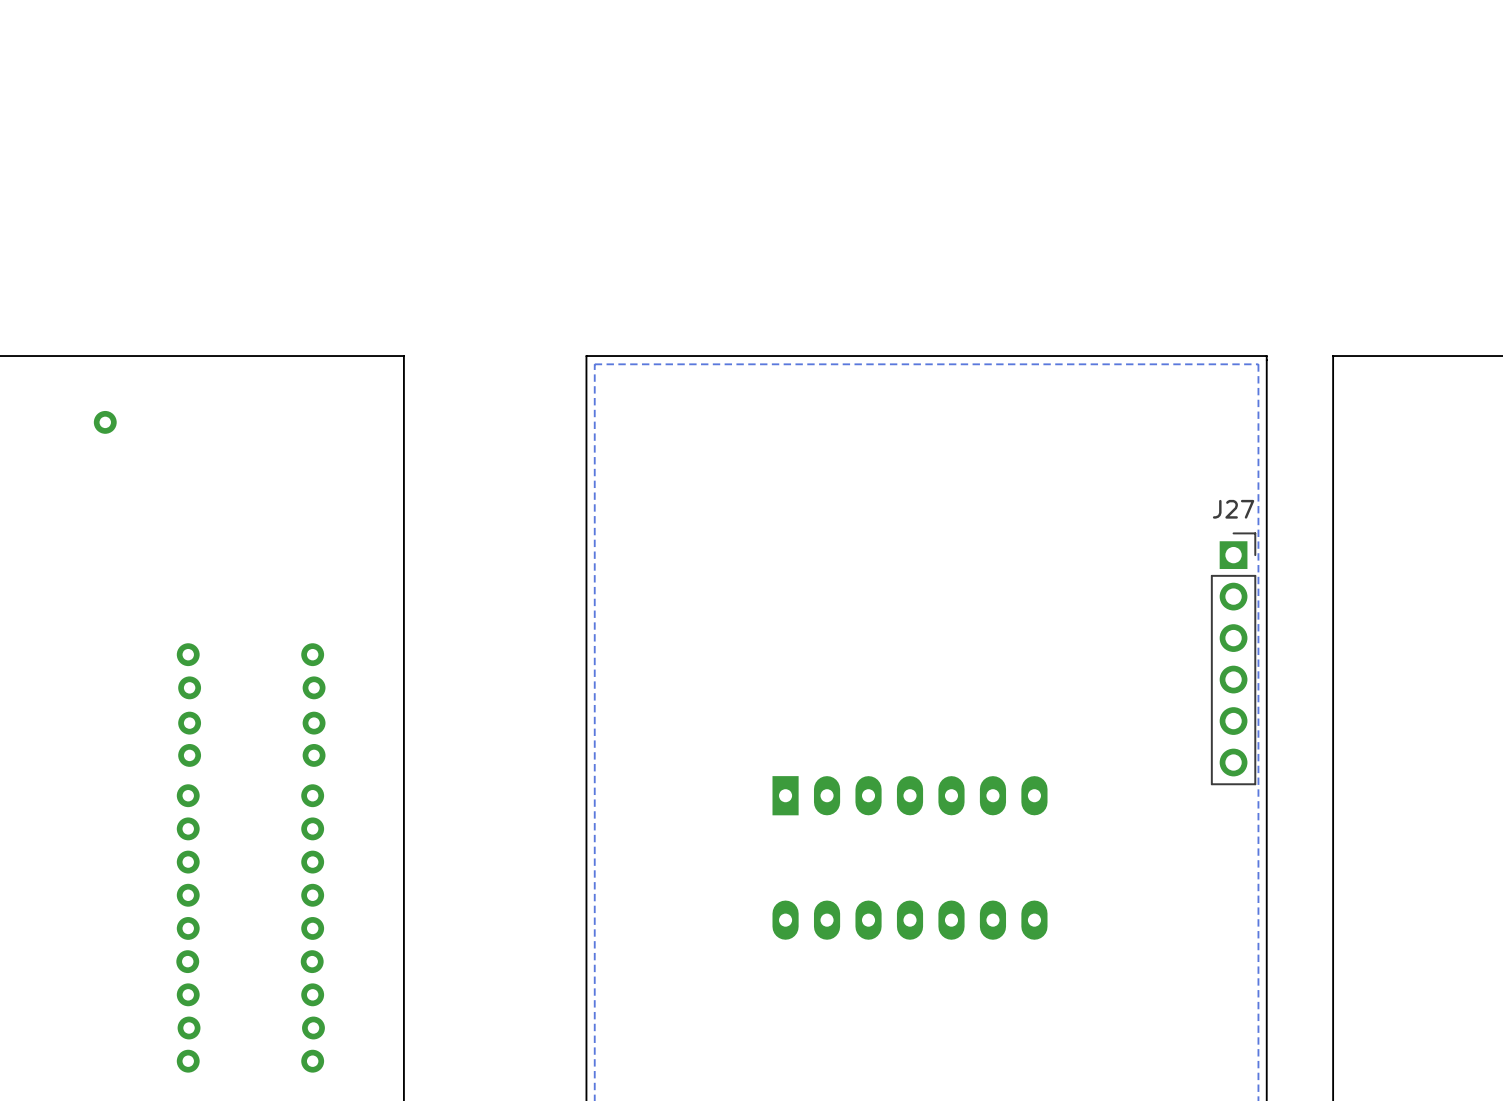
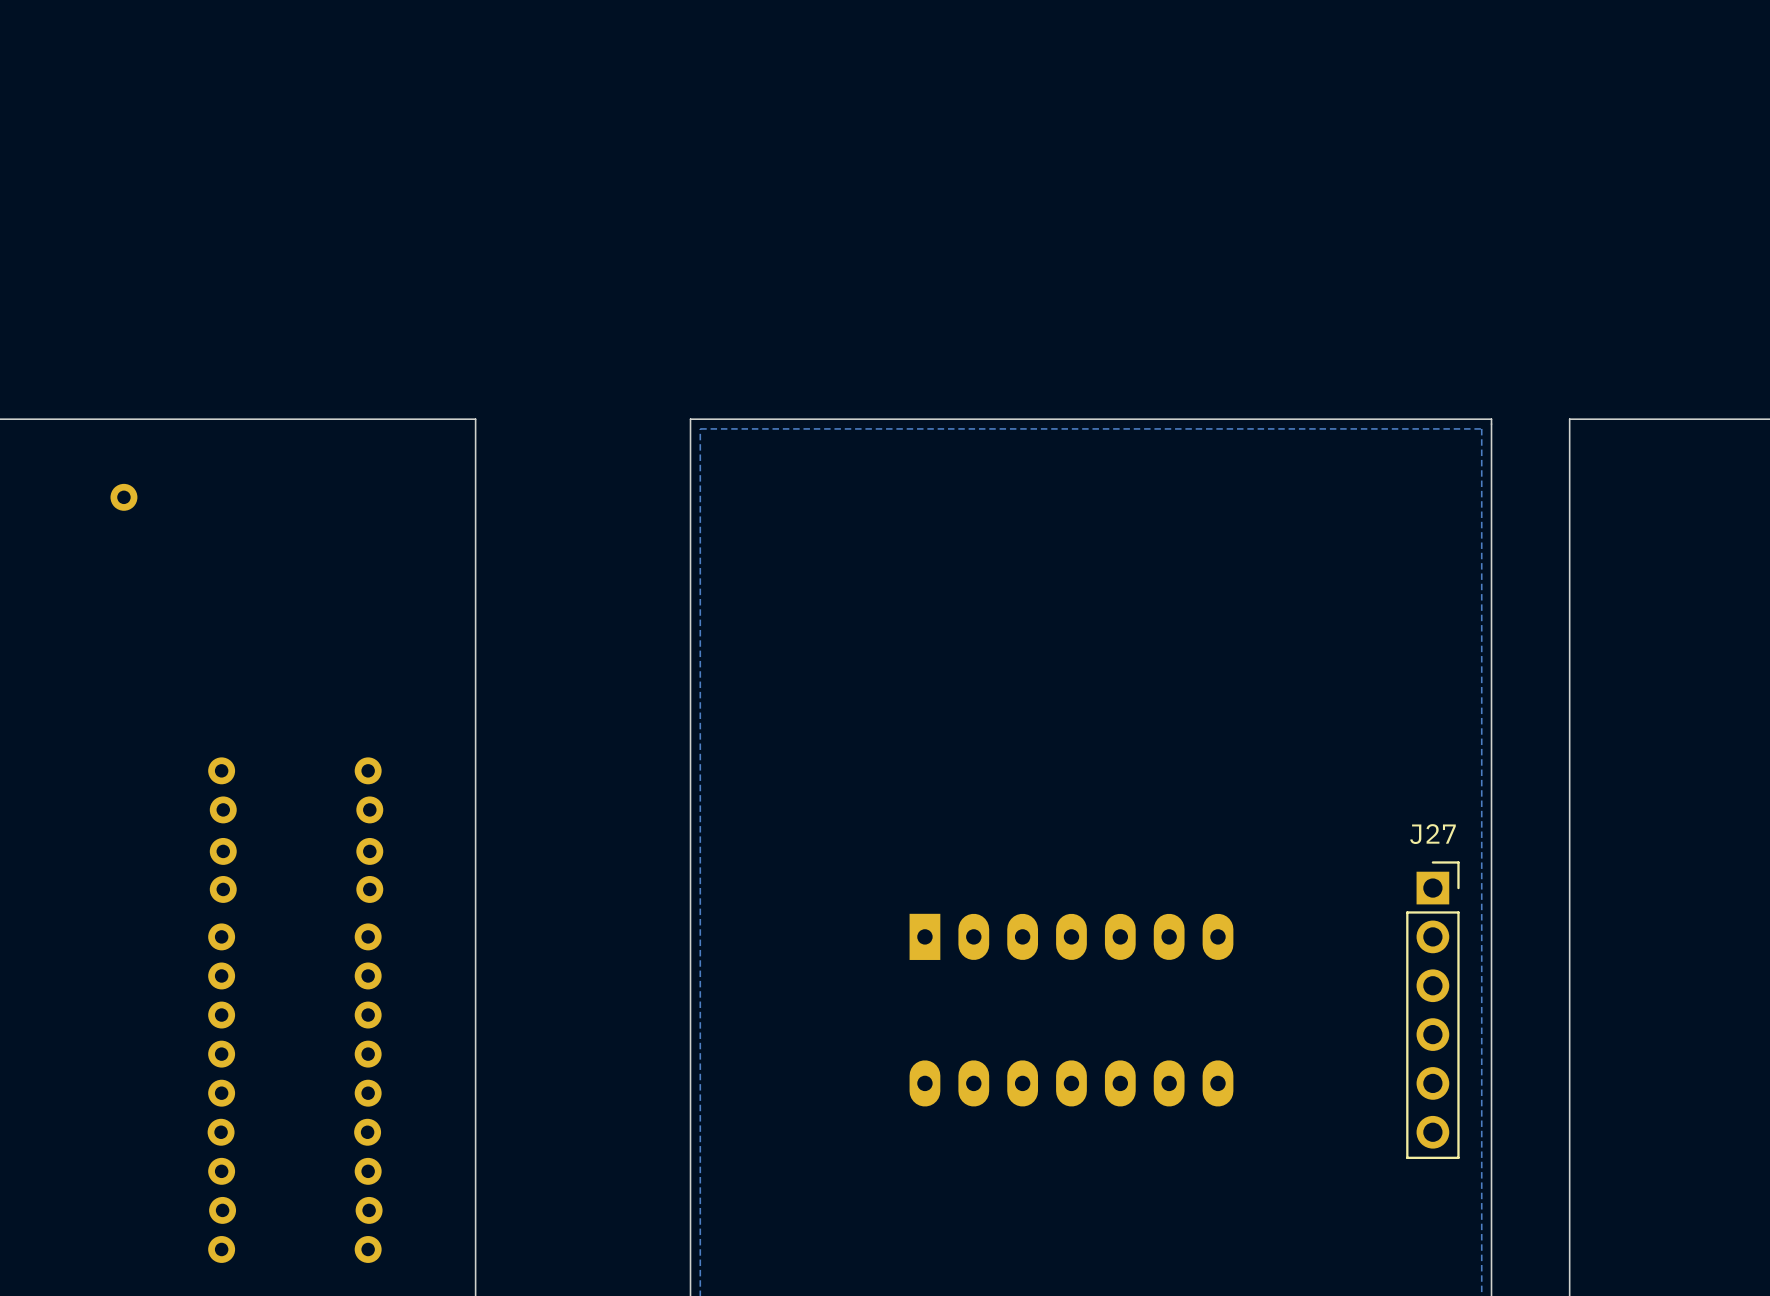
J27 position: (1233, 658) -> (1432, 1010)

